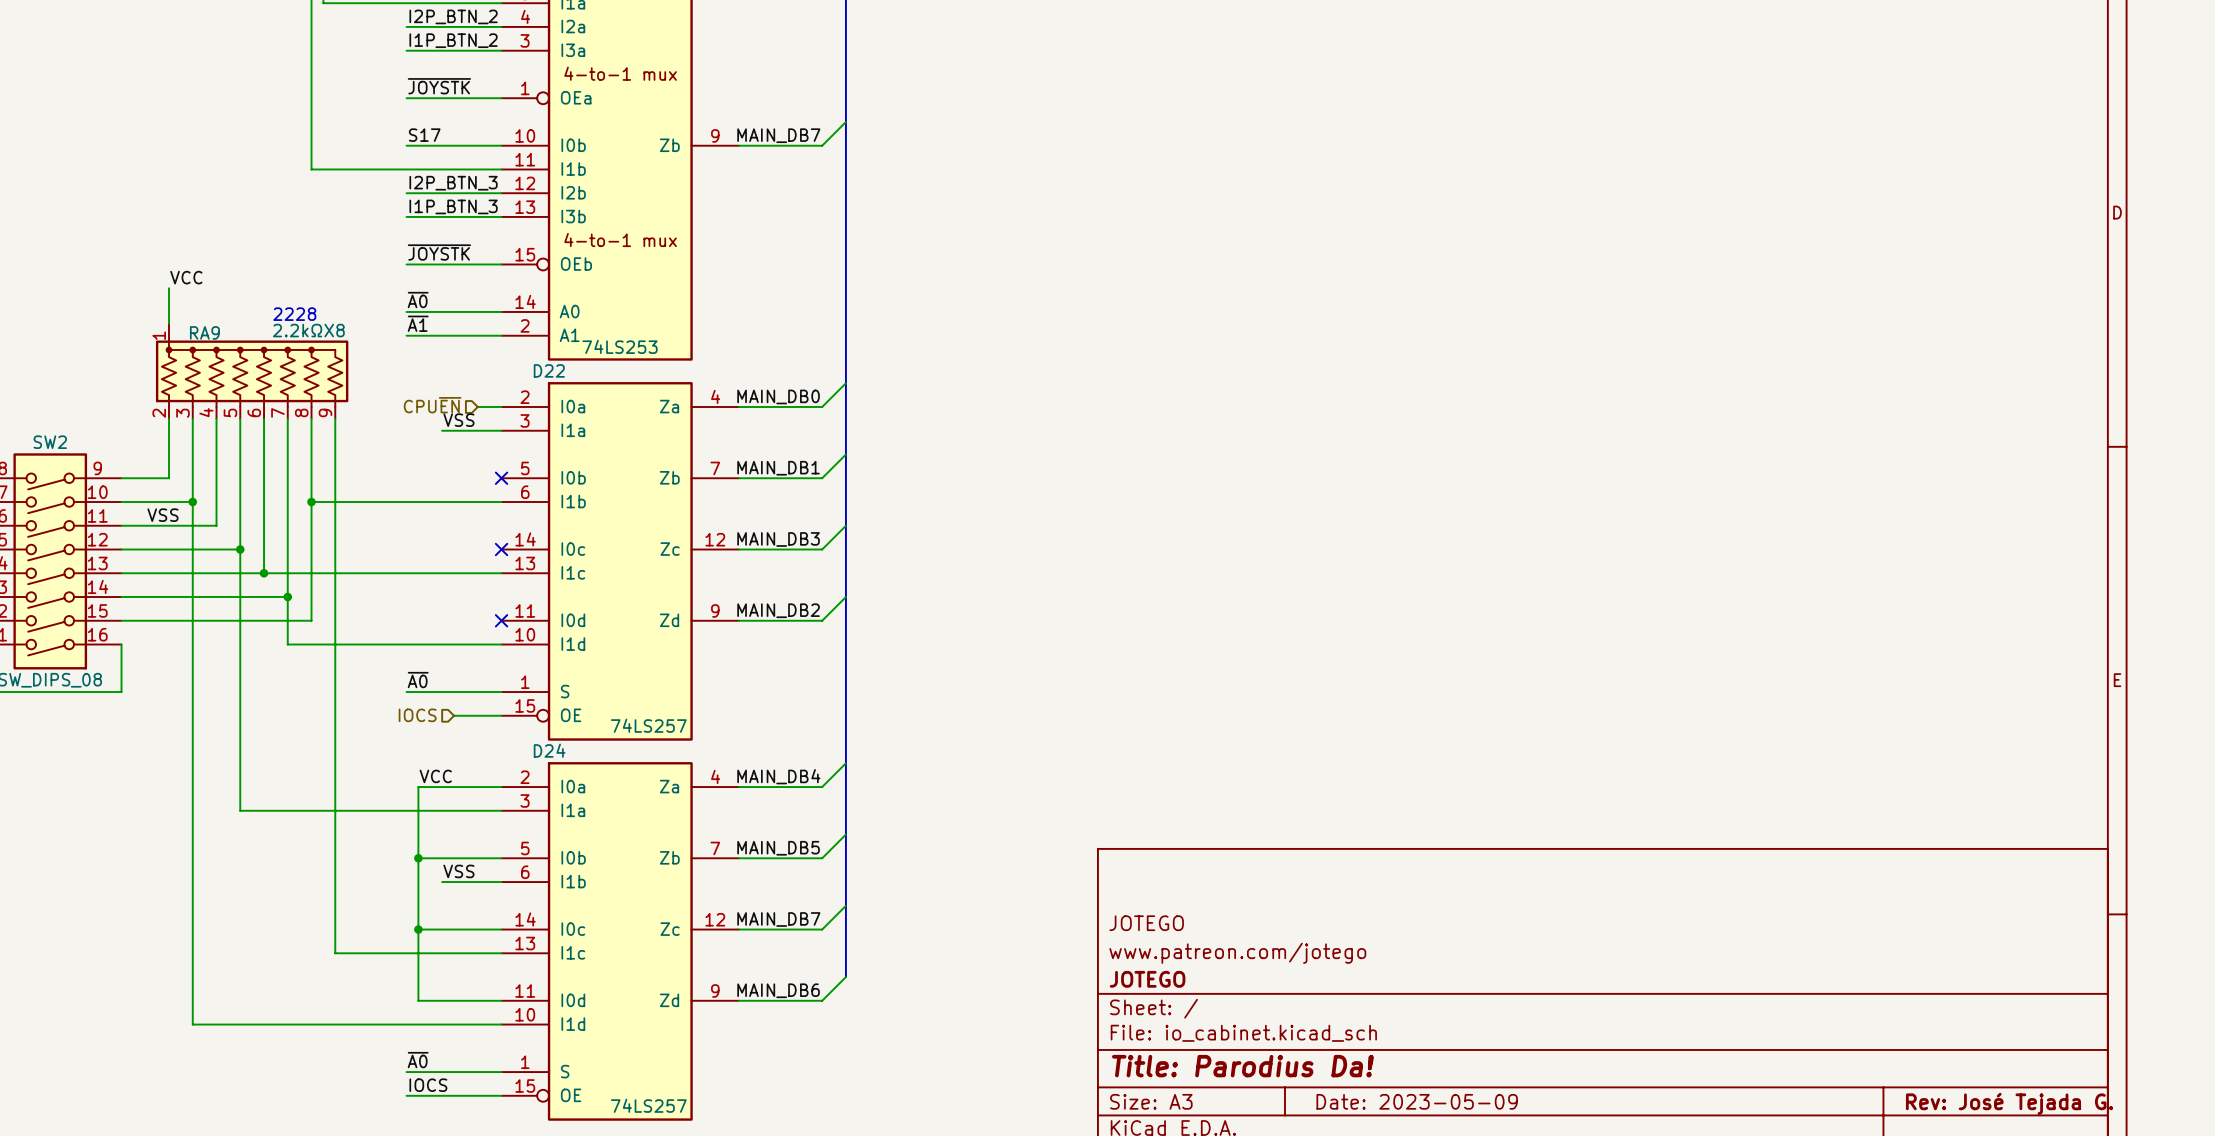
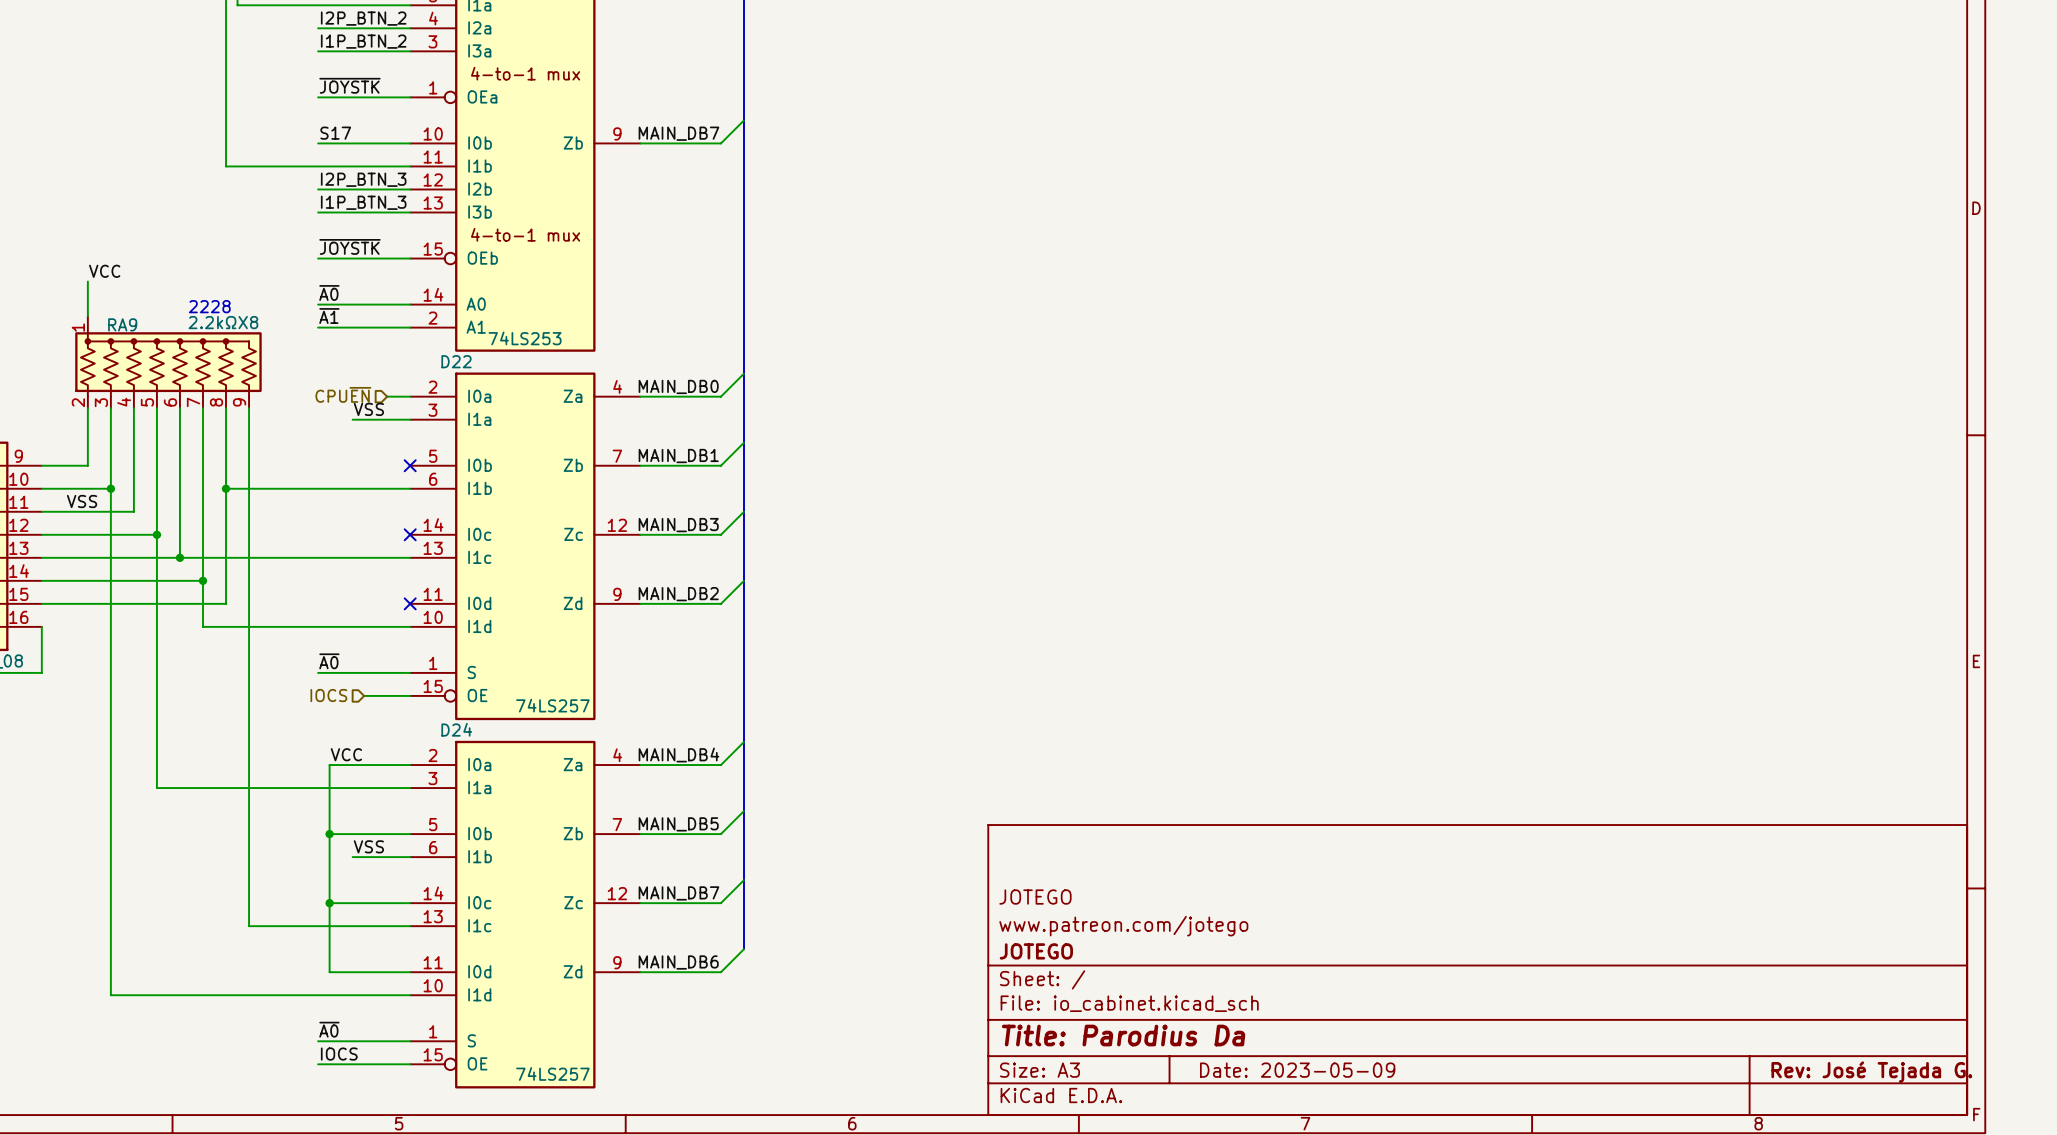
title block: Title: Parodius Da! (1242, 1066) -> Title: Parodius Da (1123, 1035)

